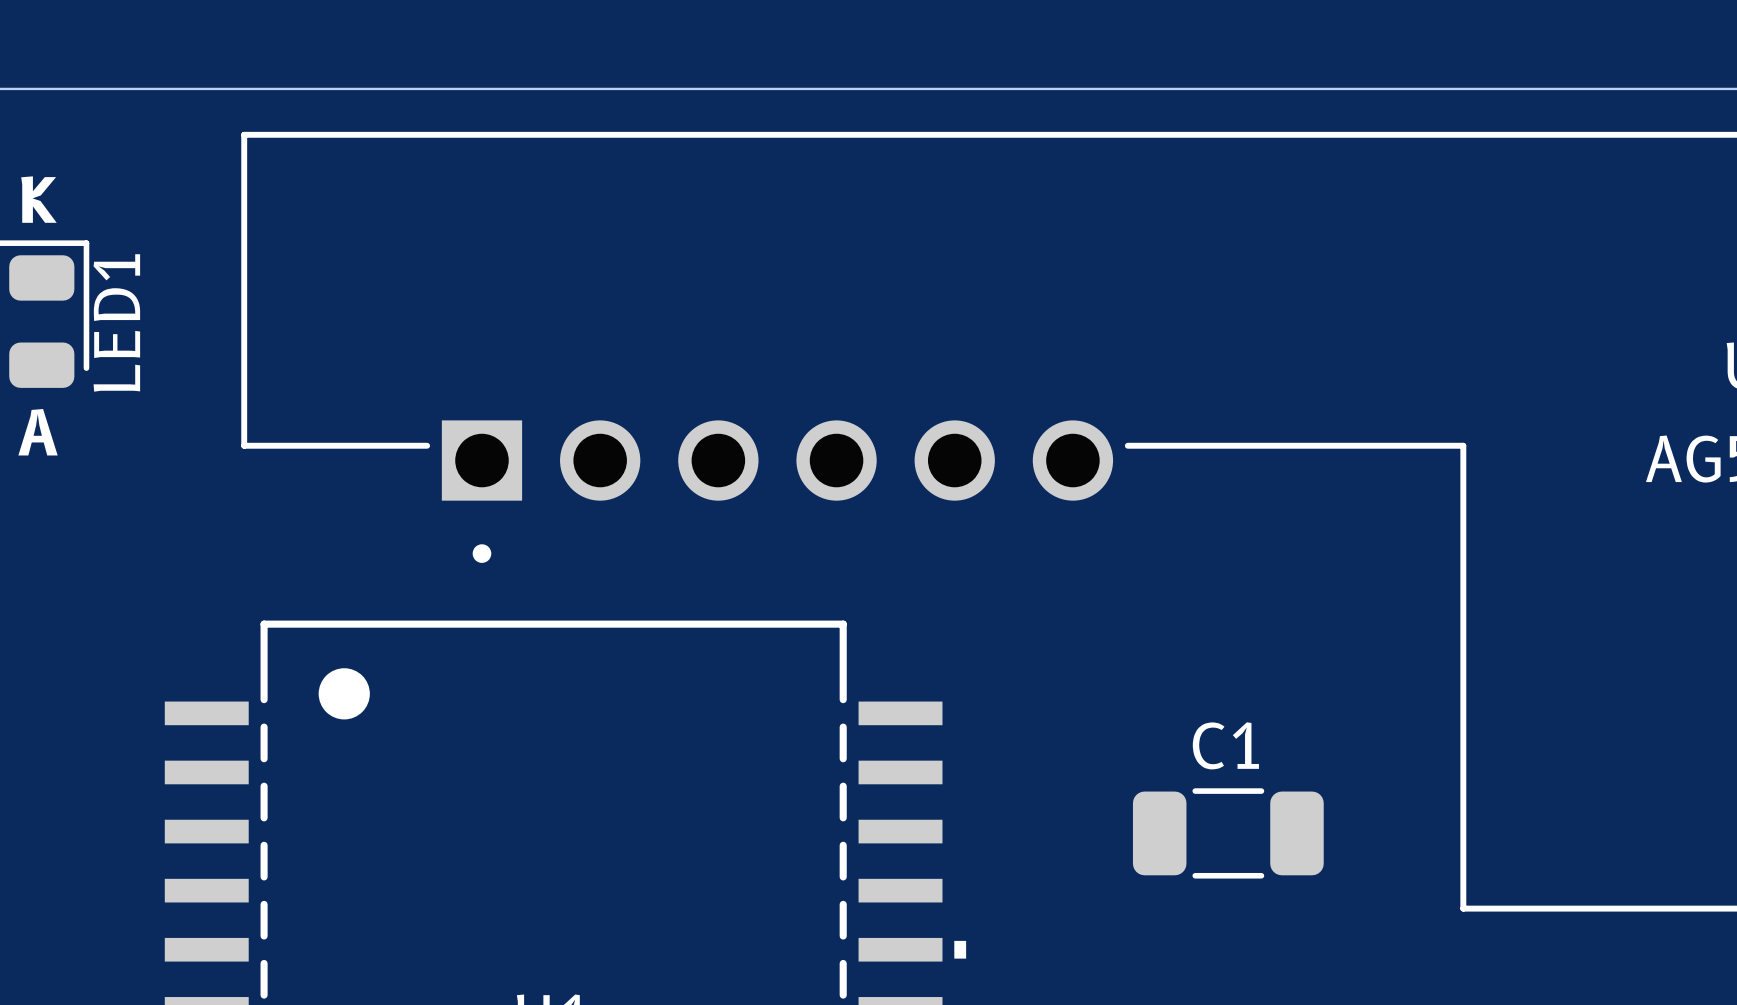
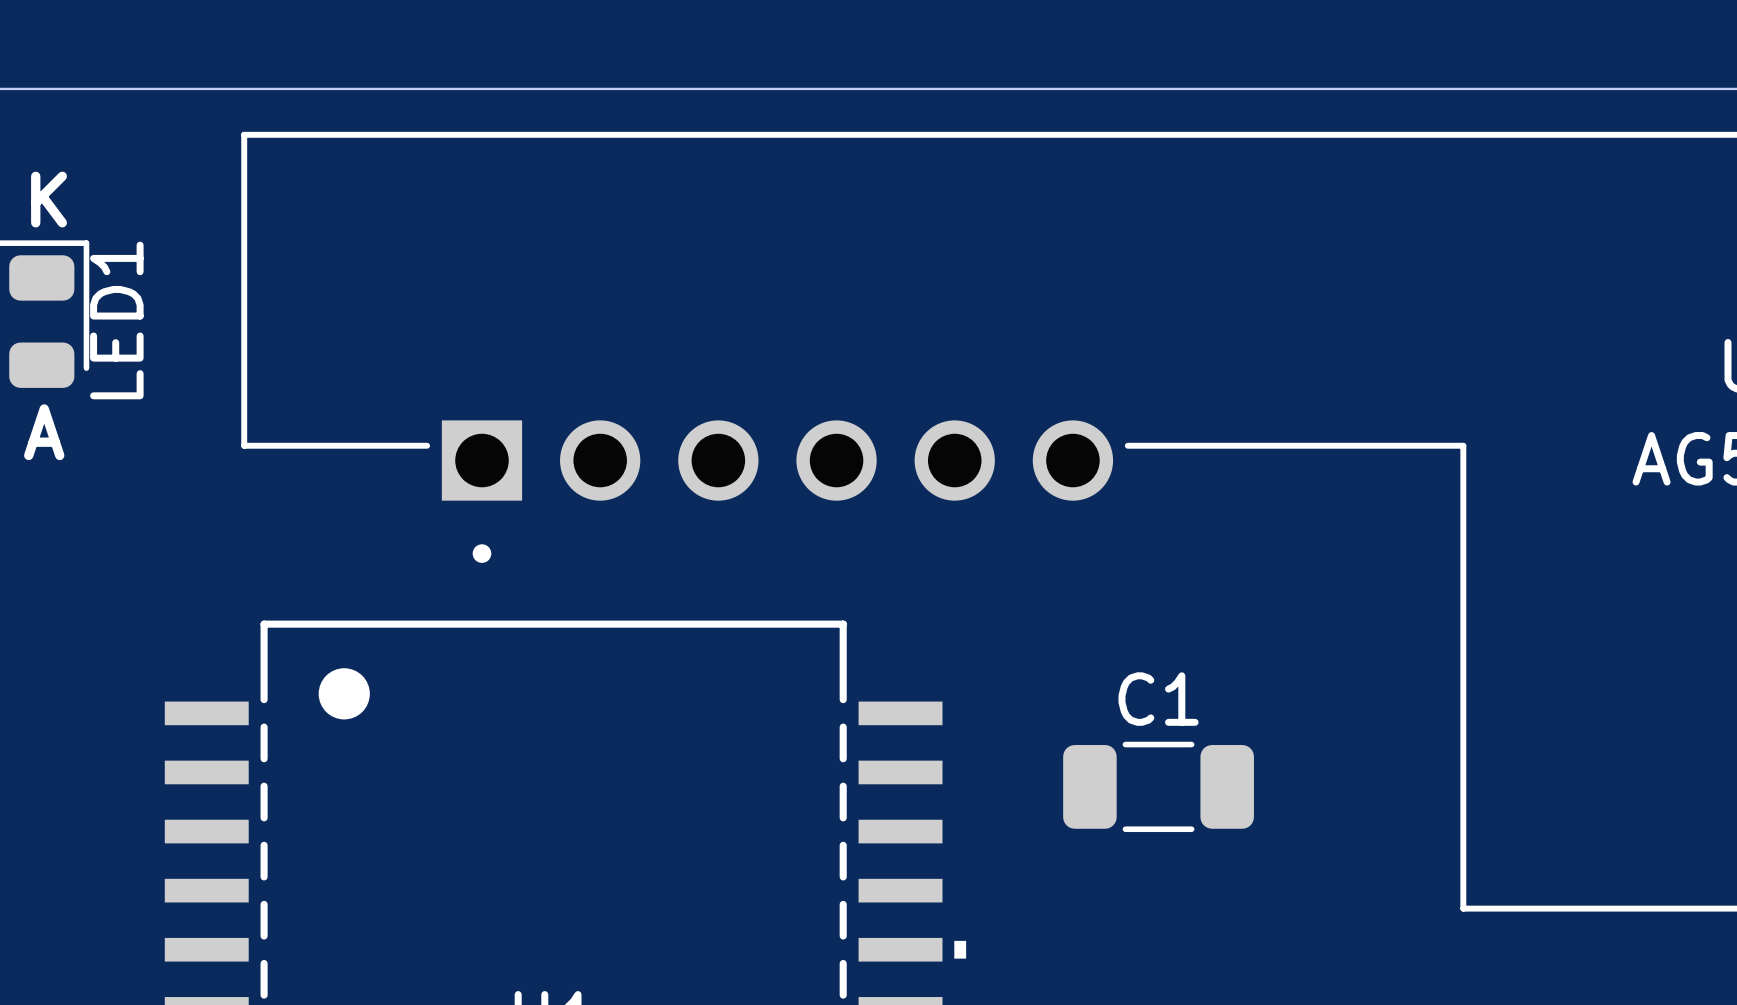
C1 position: (1228, 833) -> (1158, 786)

